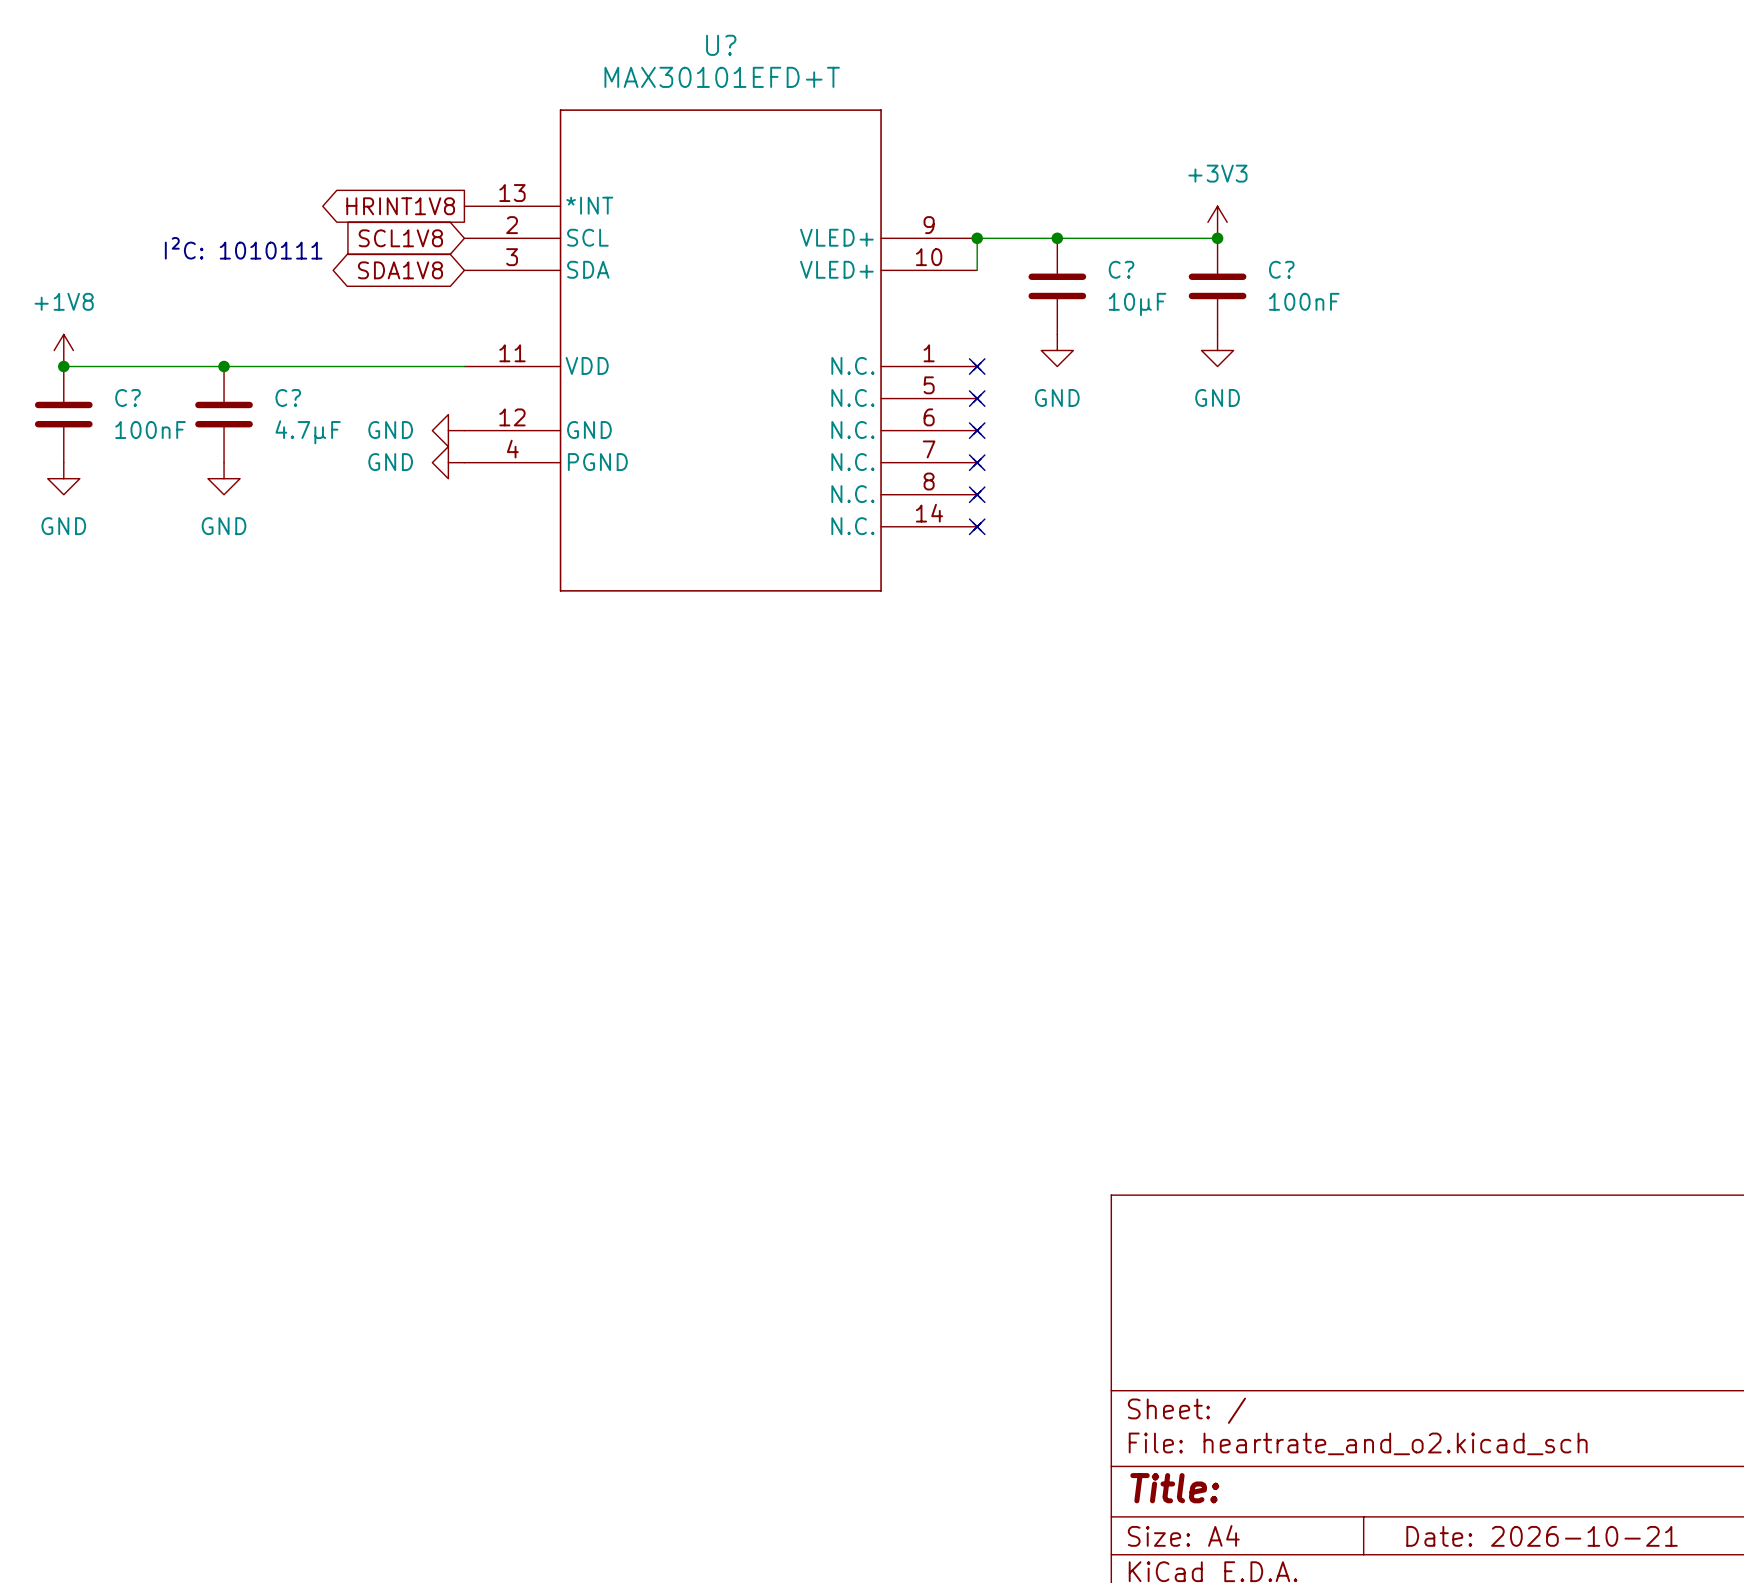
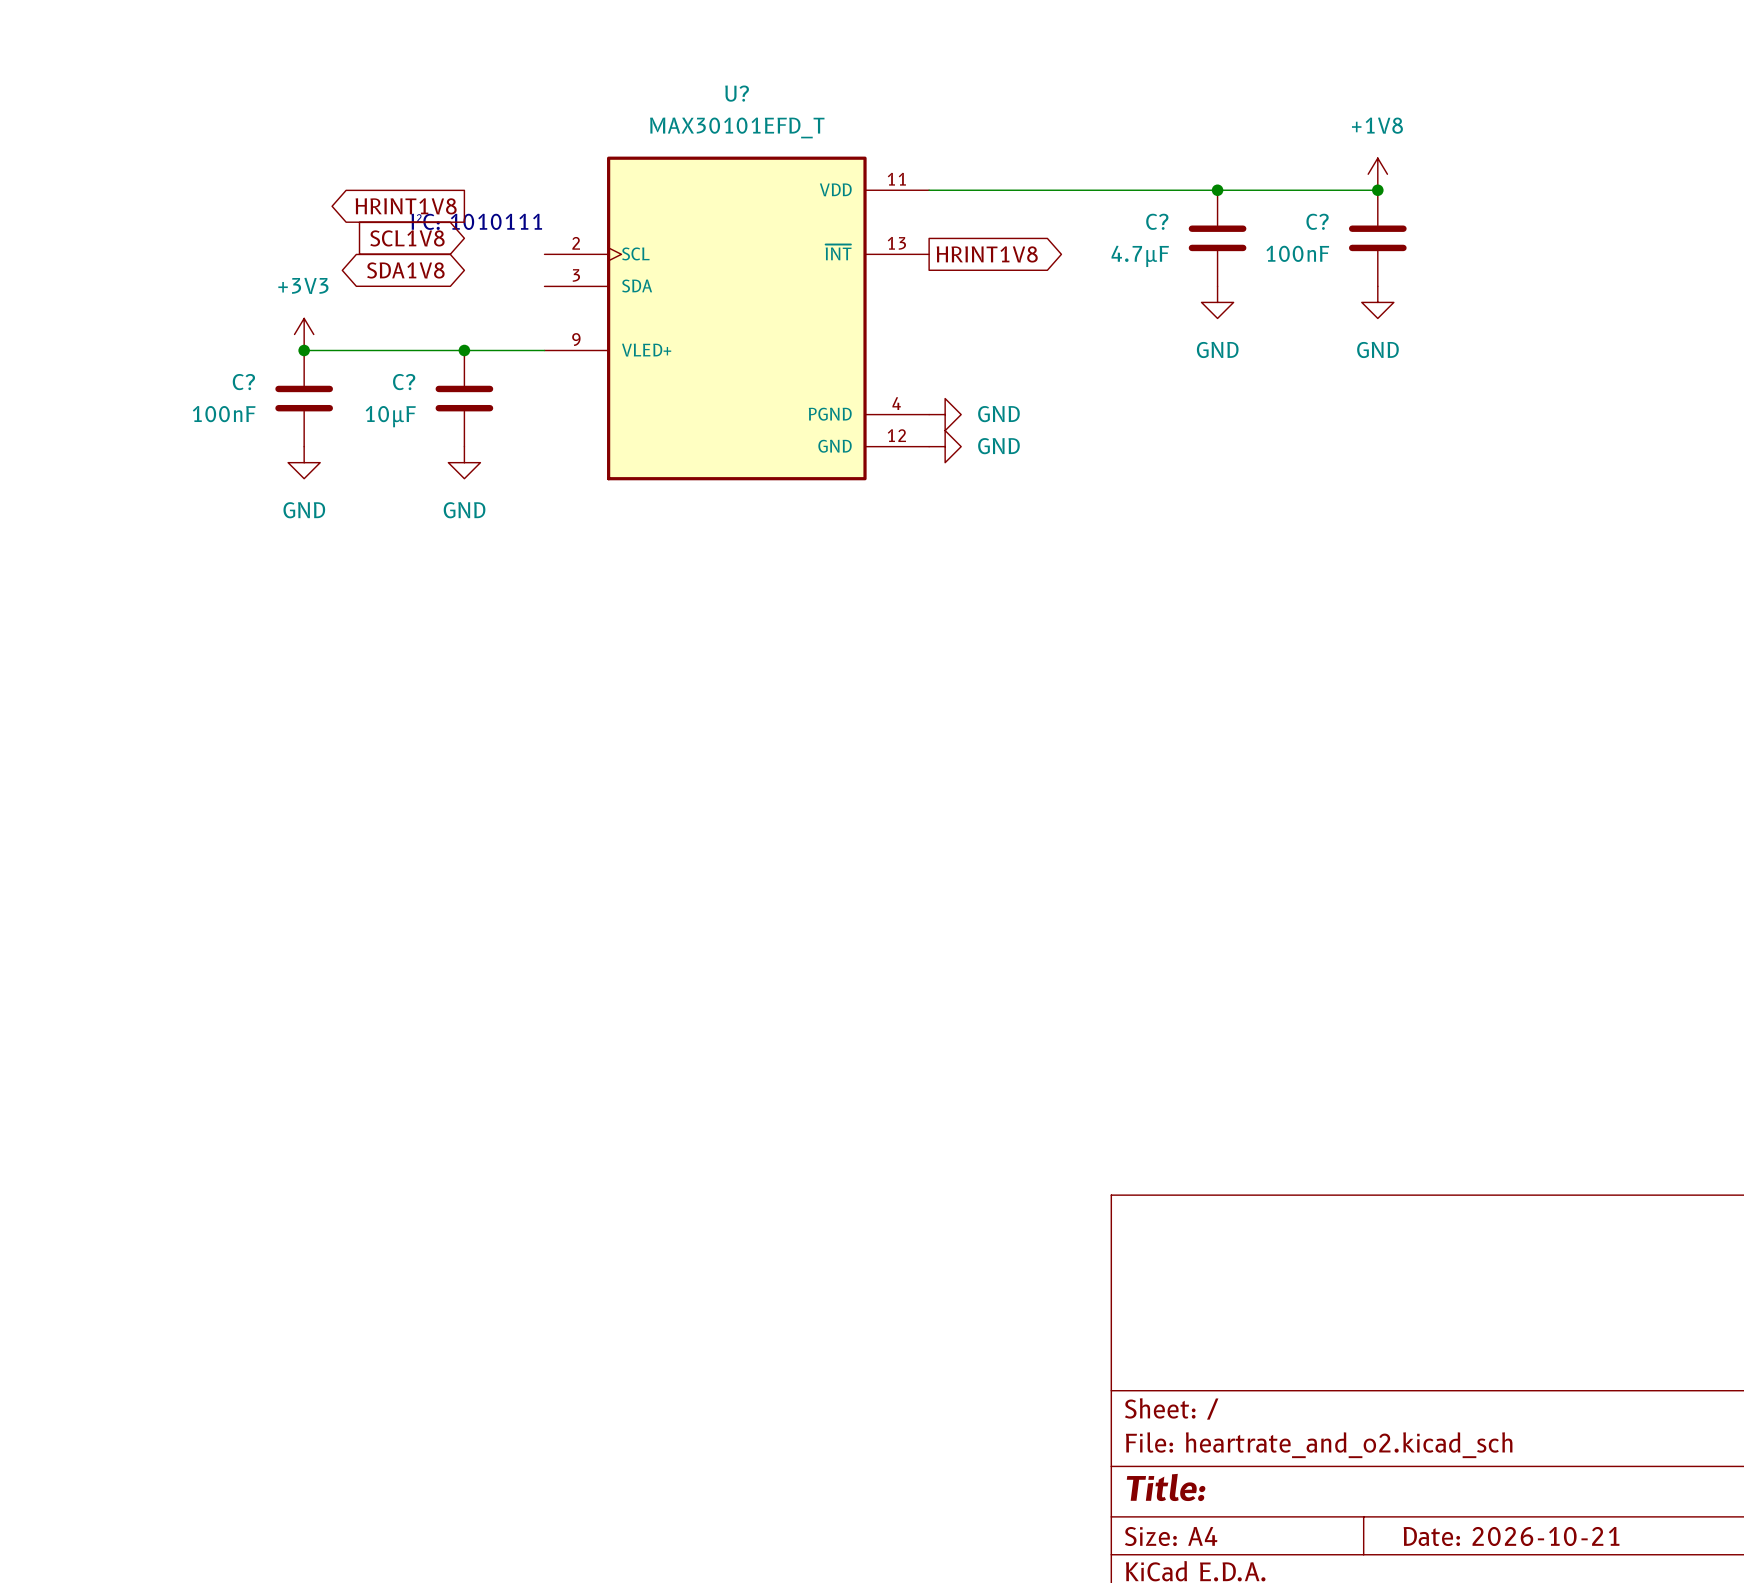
power symbol: none -> +1V8 (1377, 174)
wire: none -> (929, 190) (1377, 190)
junction: none -> (1377, 190)
power symbol: +3V3 (1217, 222) -> none
junction: (977, 238) -> none
junction: (1057, 238) -> none
wire: (1217, 238) (977, 238) (977, 270) -> none
junction position: (1217, 238) -> (1217, 190)
C?: none -> 4.7µF (1217, 238)
text position: I²C: 1010111 (243, 248) -> I²C: 1010111 (476, 221)
global label: none -> HRINT1V8 (987, 254)
C? name position: C? (1281, 269) -> C? (1317, 221)
C?: 10µF (1057, 286) -> none
C? position: (1217, 286) -> (1377, 238)
C? value position: 100nF (1304, 301) -> 100nF (1297, 253)
power symbol: none -> GND (1377, 302)
U?: none -> MAX30101EFD_T (736, 318)
power symbol: none -> +3V3 (304, 334)
power symbol: +1V8 (63, 350) -> none
wire: none -> (304, 350) (544, 350)
junction: none -> (304, 350)
junction: none -> (464, 350)
U?: MAX30101EFD+T (722, 350) -> none
power symbol: GND (1057, 350) -> none
power symbol position: GND (1217, 350) -> GND (1217, 302)
wire: (63, 366) (464, 366) -> none
junction: (63, 366) -> none
junction: (224, 366) -> none
no-connect mark: (977, 366) -> none
C? name position: C? (128, 397) -> C? (243, 382)
C?: none -> 10µF (464, 398)
no-connect mark: (977, 398) -> none
C? position: (63, 414) -> (304, 398)
C?: 4.7µF (224, 414) -> none
power symbol: none -> GND (945, 414)
C? value position: 100nF (150, 430) -> 100nF (224, 414)
power symbol: GND (448, 430) -> none
no-connect mark: (977, 430) -> none
power symbol: none -> GND (945, 446)
power symbol: none -> GND (304, 462)
power symbol rotation: 0° (448, 462) -> 90° counterclockwise (464, 462)
no-connect mark: (977, 462) -> none
power symbol: GND (63, 478) -> none
power symbol: GND (224, 478) -> none
no-connect mark: (977, 494) -> none
no-connect mark: (977, 526) -> none

